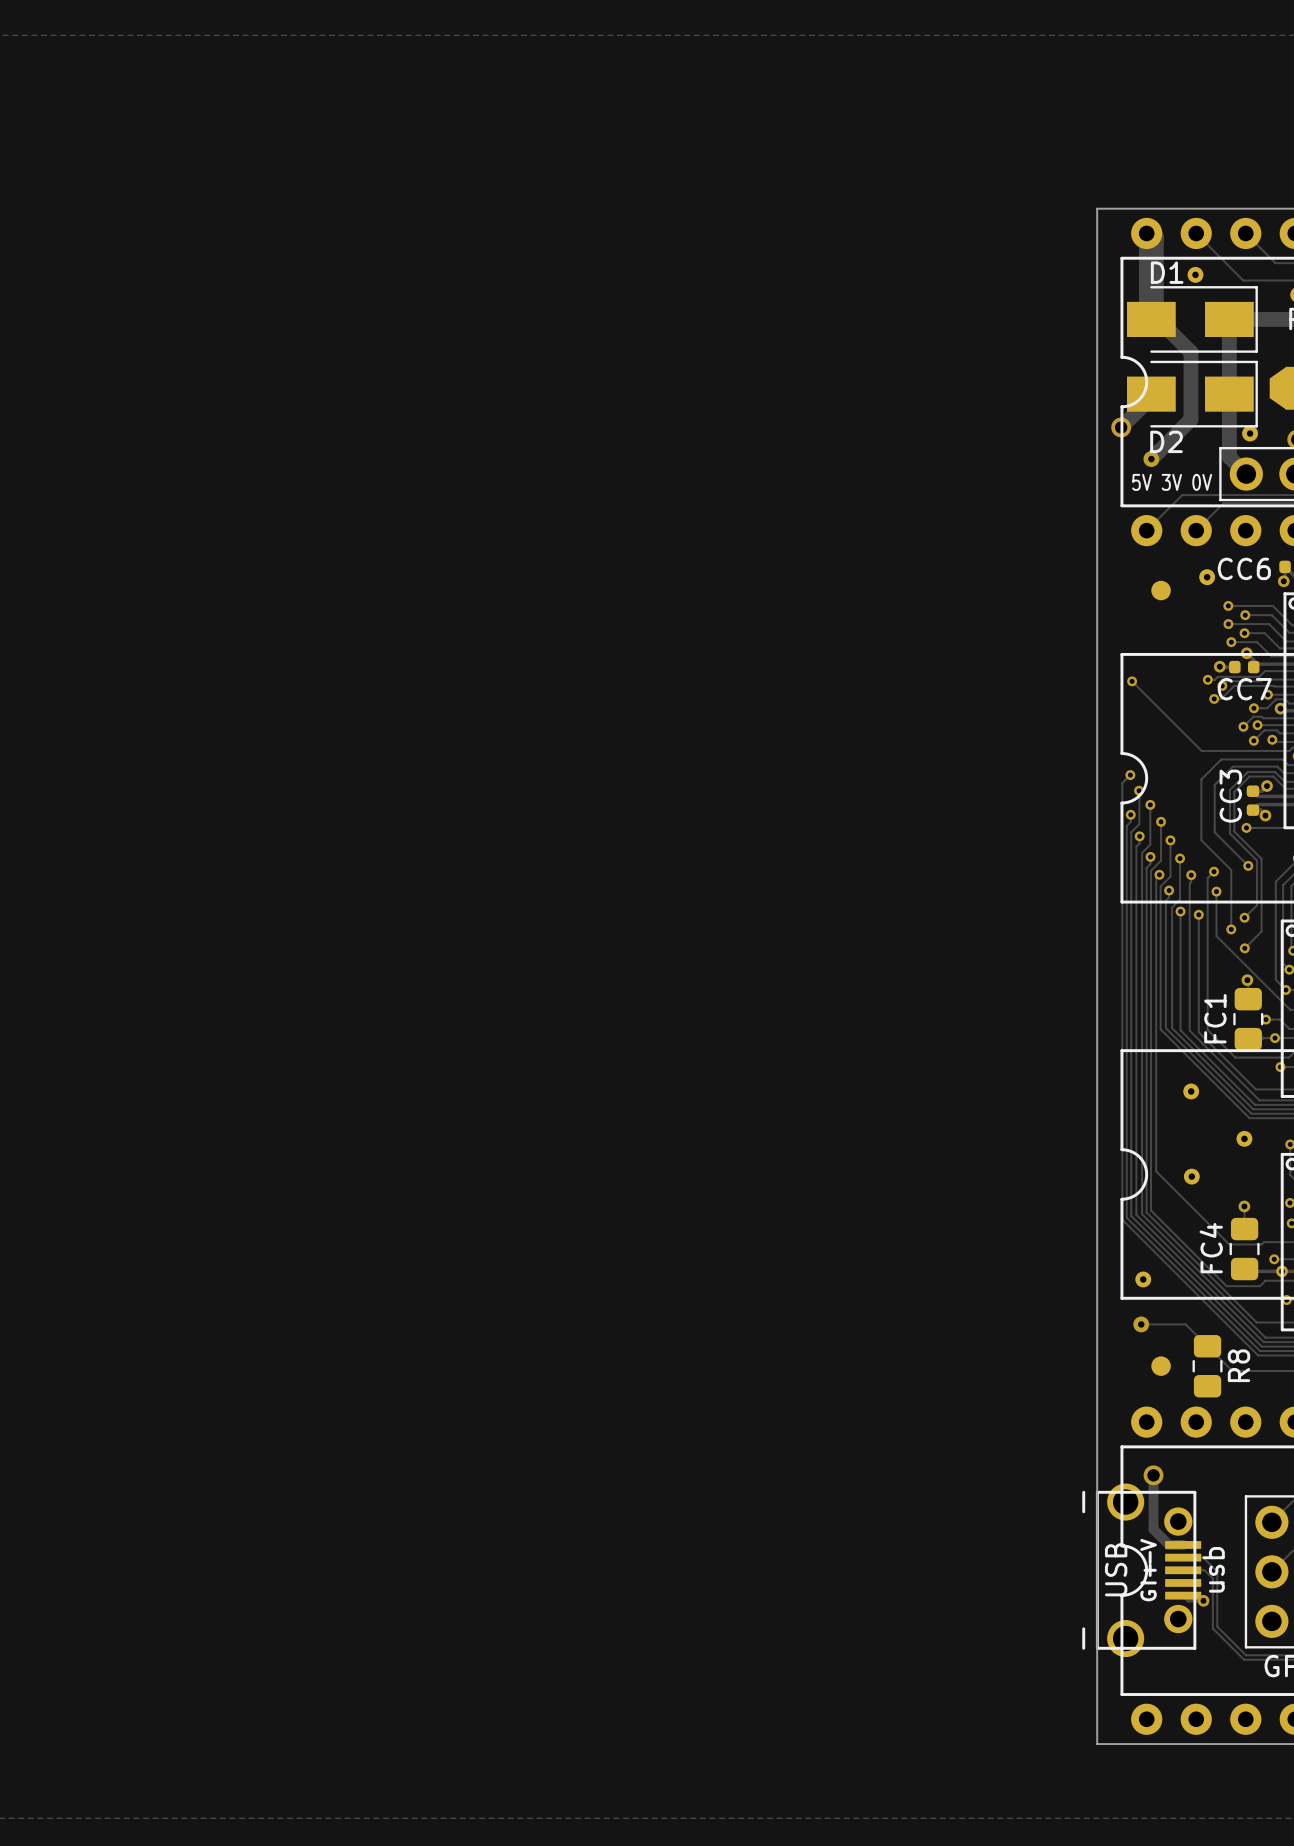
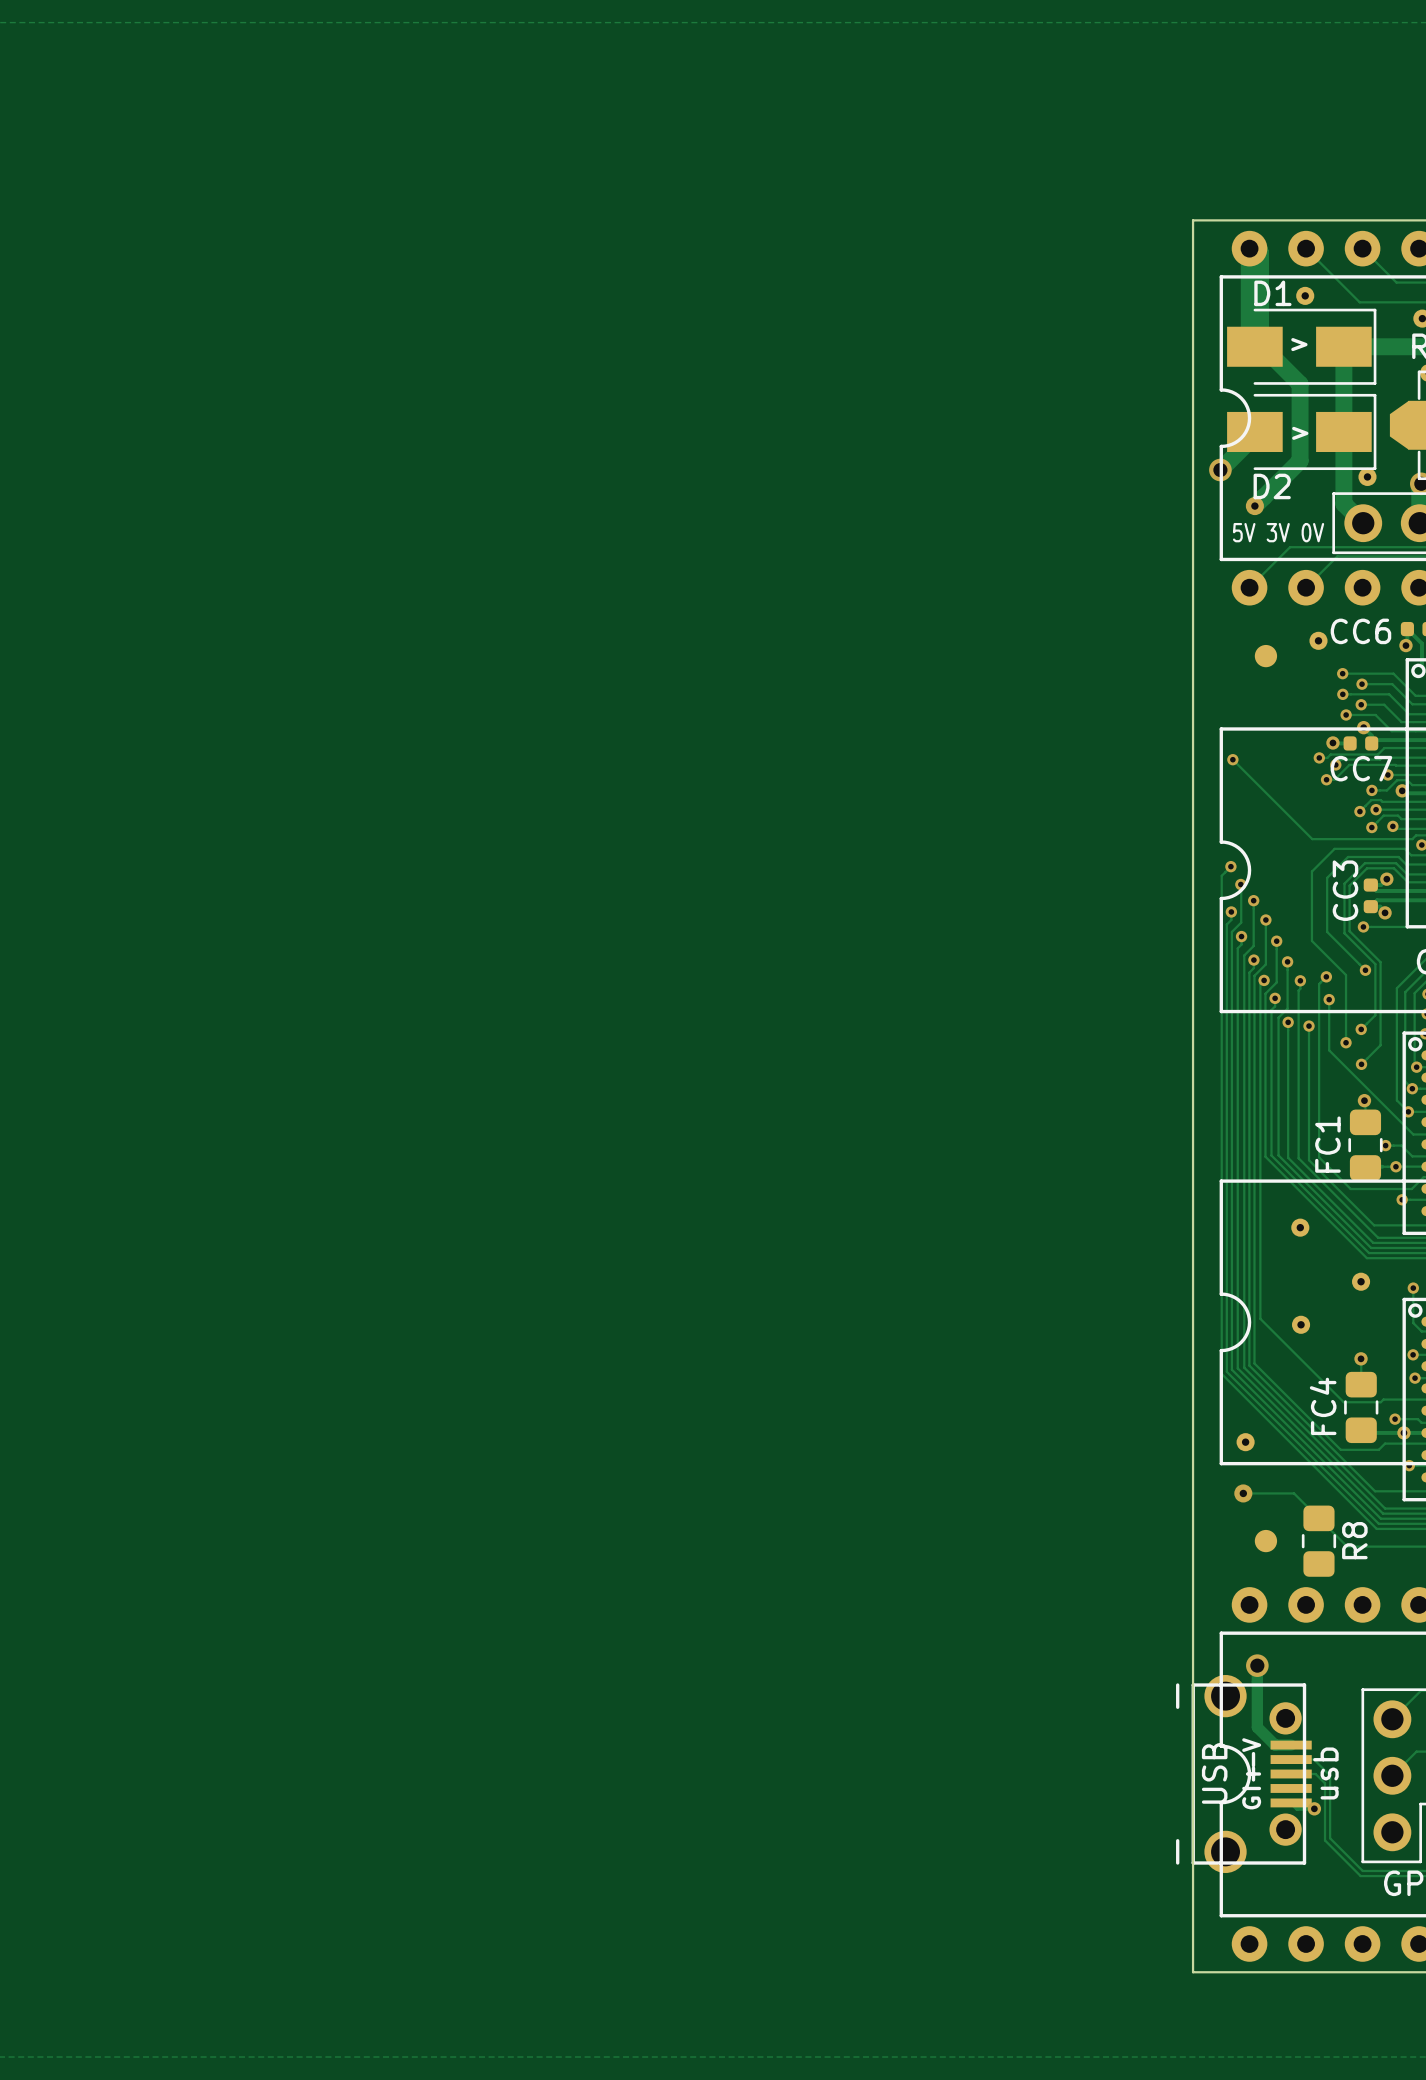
text: none -> > (1299, 344)
text: none -> > (1300, 433)

